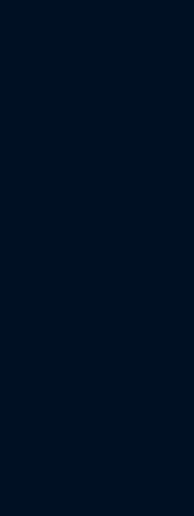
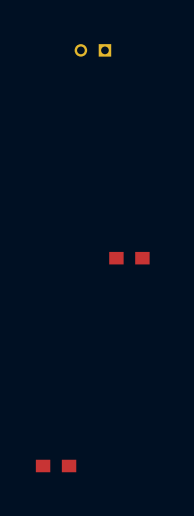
part: none -> (92, 50)
part: none -> (129, 258)
part: none -> (56, 465)

